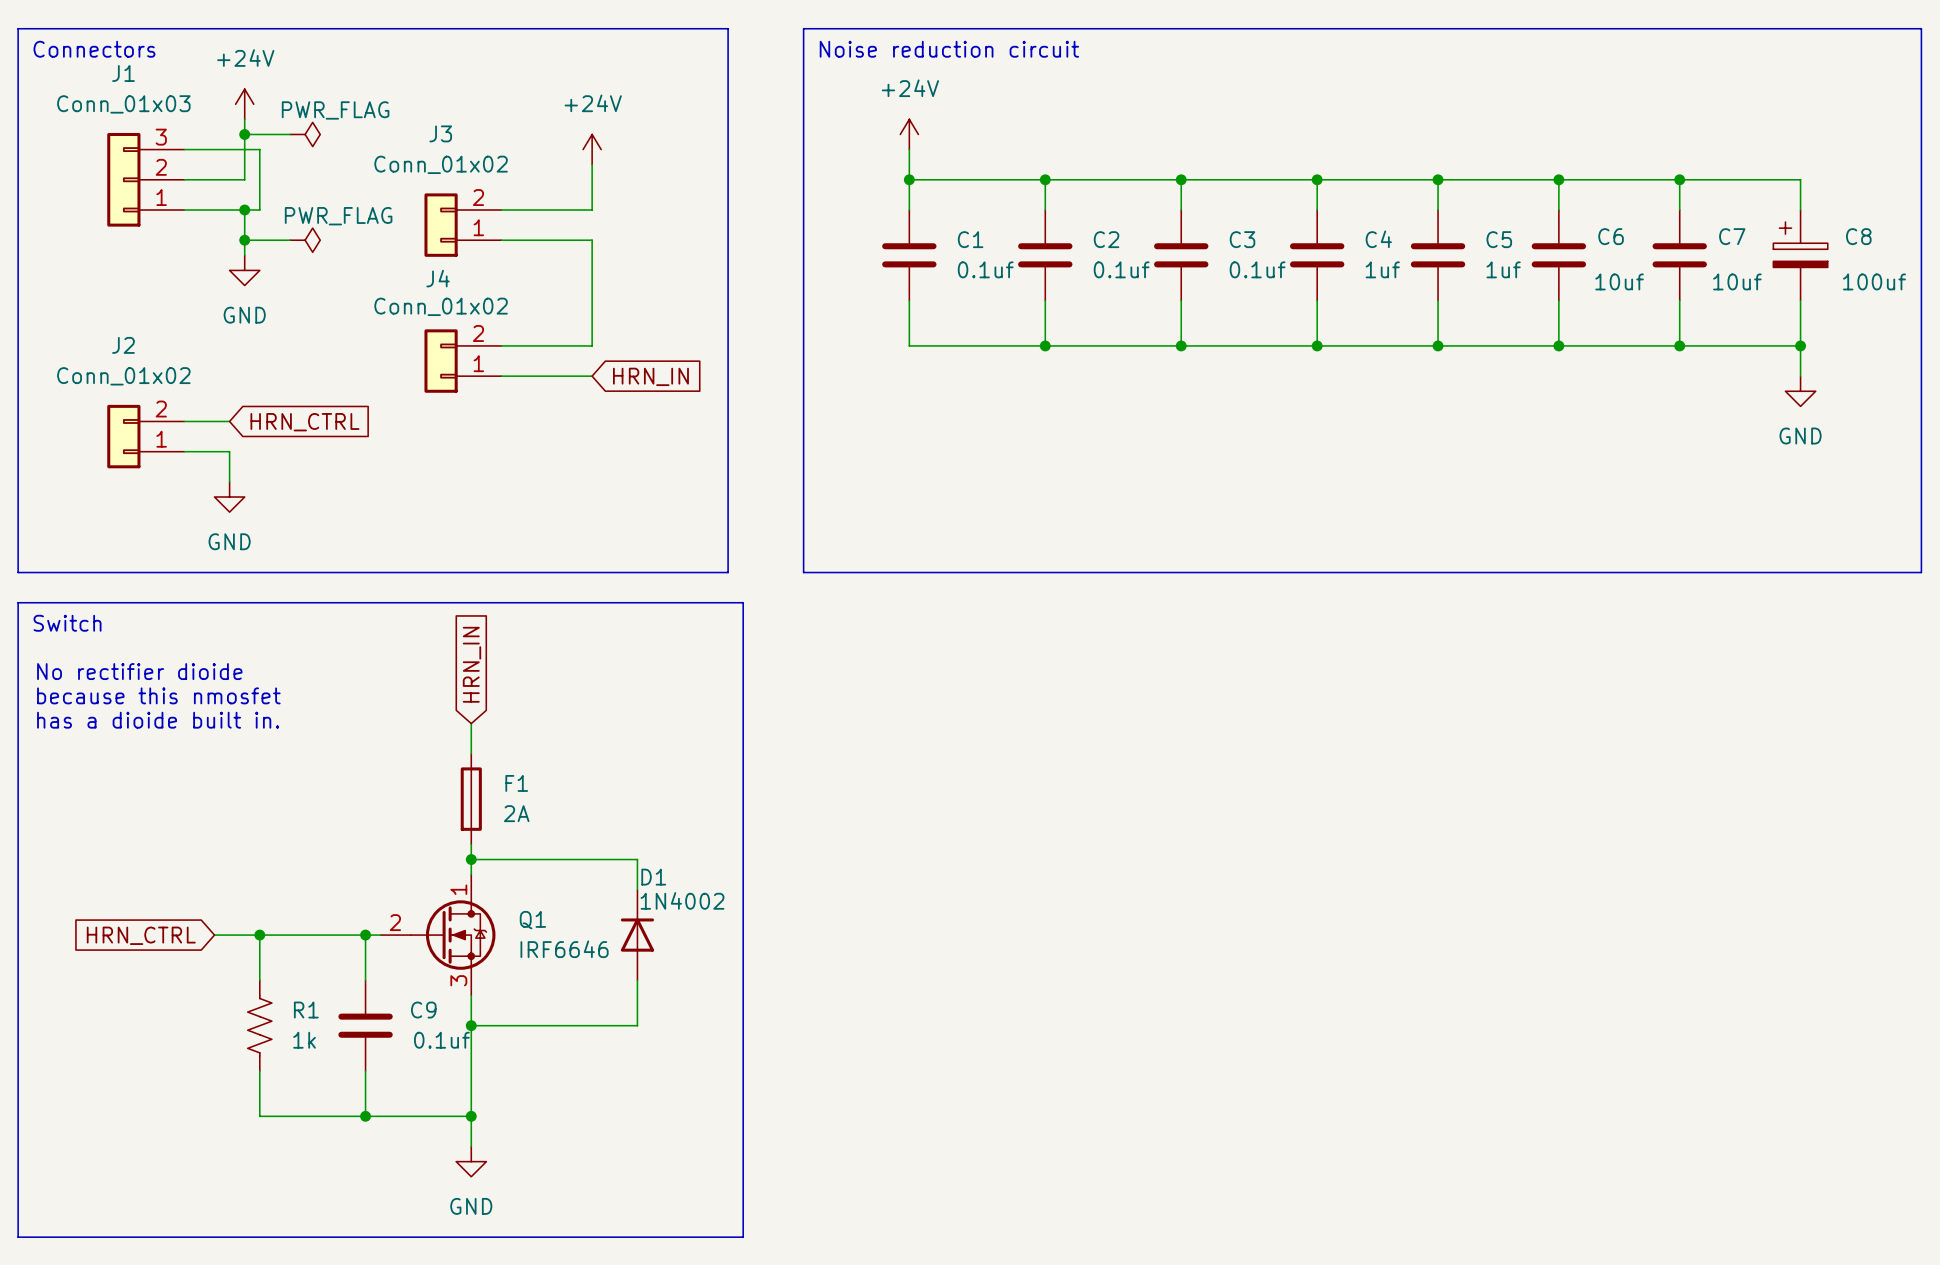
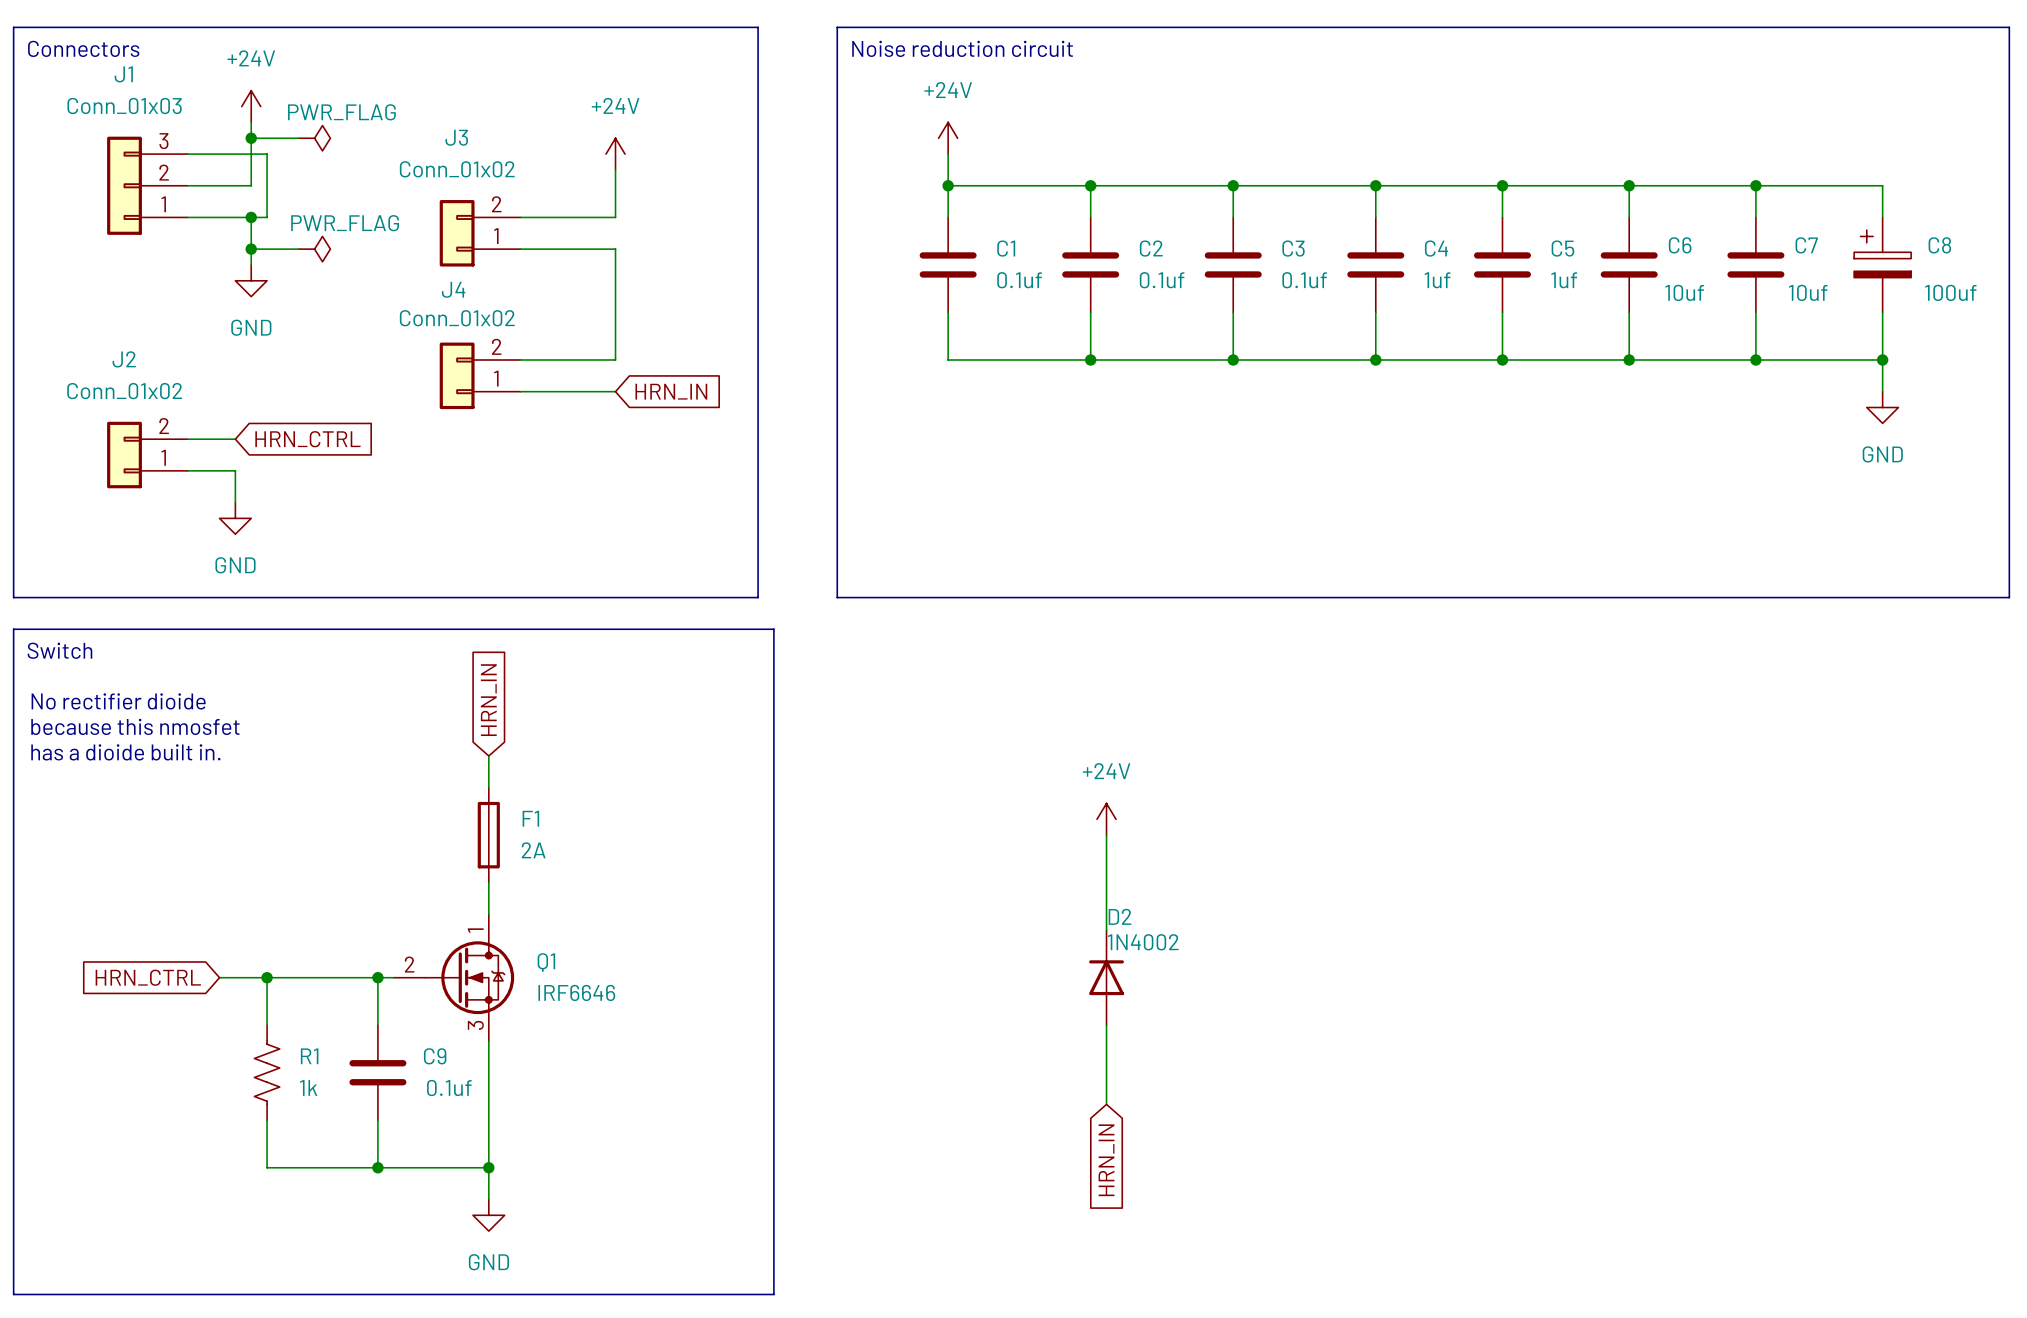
power symbol: none -> +24V (1106, 819)
wire: none -> (1106, 835) (1106, 930)
wire: (471, 859) (637, 859) (637, 889) -> none
junction: (471, 859) -> none
D1: 1N4002 (637, 935) -> none
D2: none -> 1N4002 (1106, 977)
wire: (637, 980) (637, 1025) (471, 1025) -> none
wire: none -> (1106, 1025) (1106, 1104)
junction: (471, 1025) -> none
global label: none -> HRN_IN (1106, 1160)

